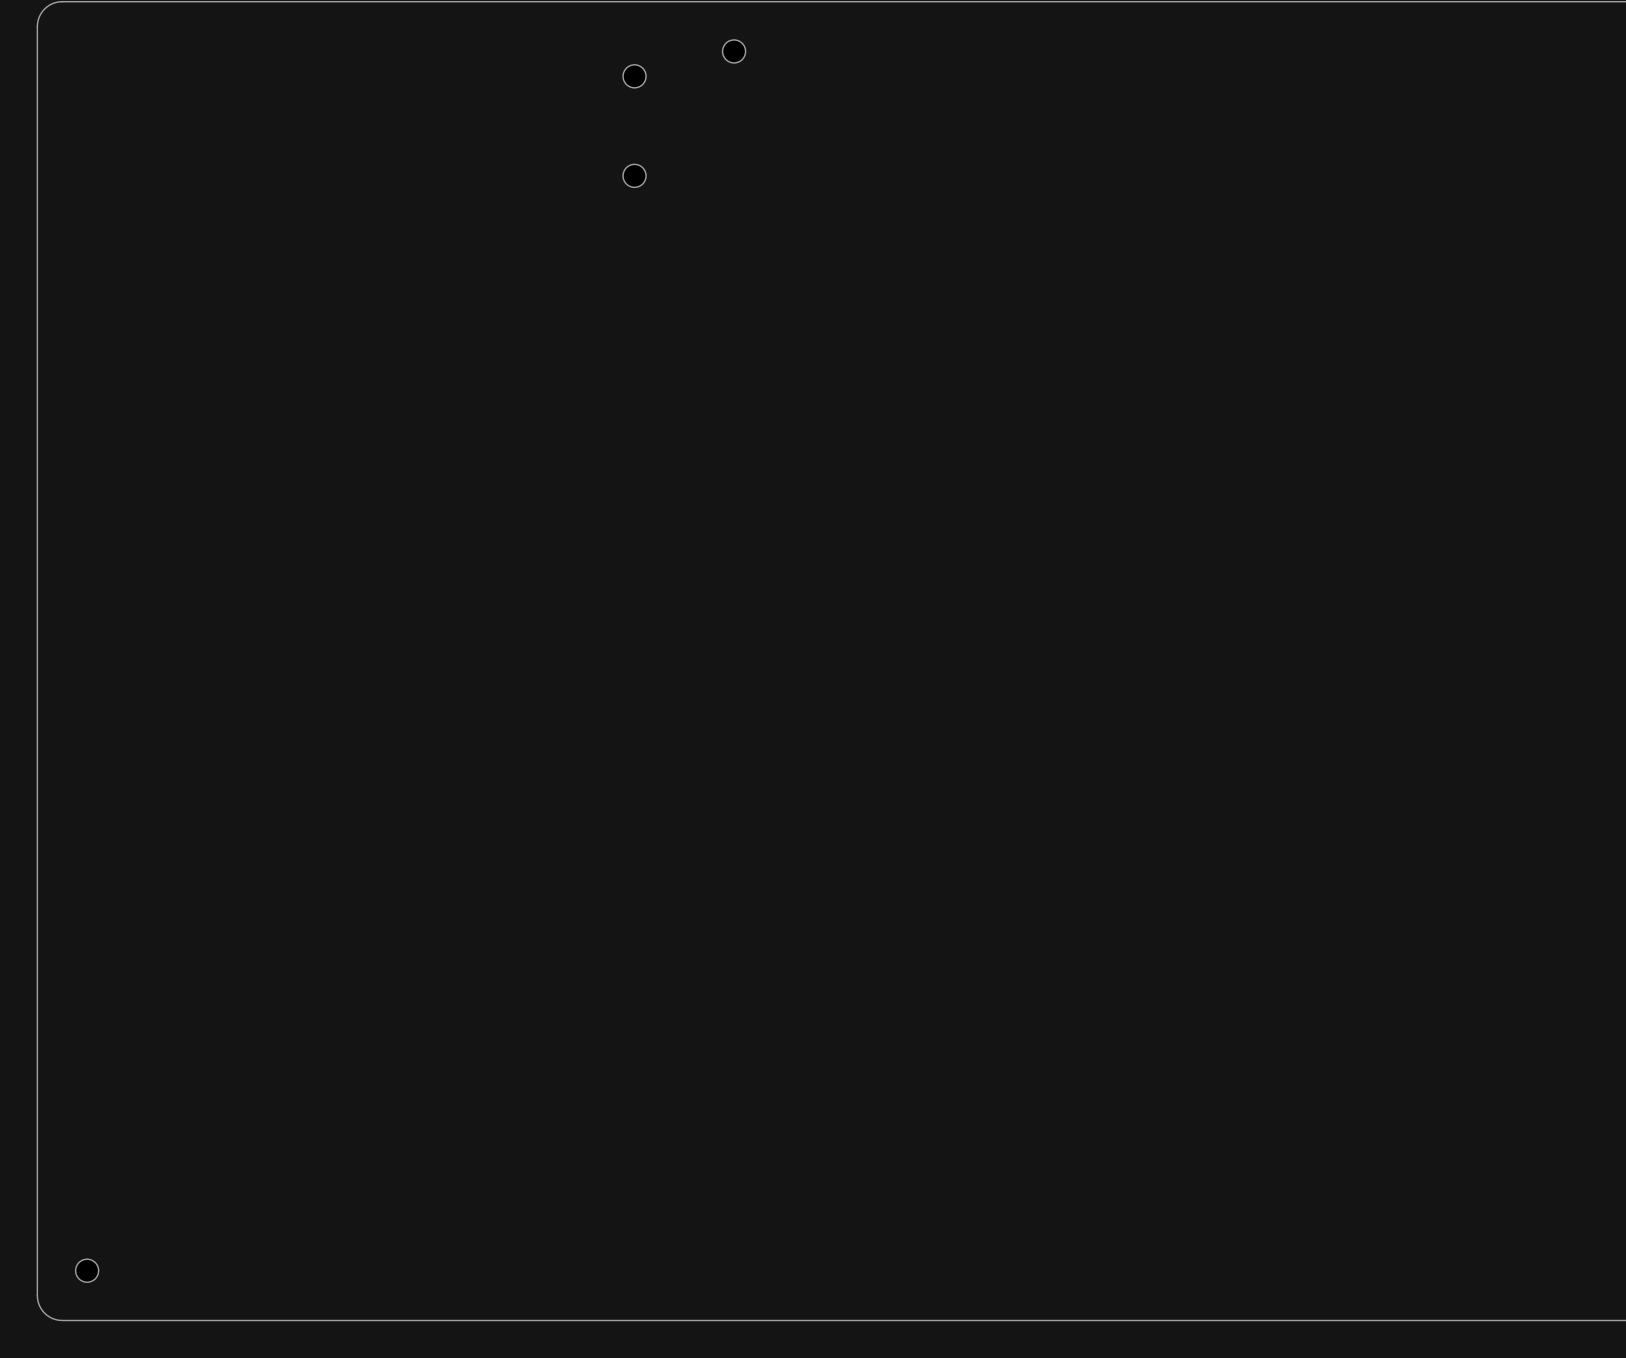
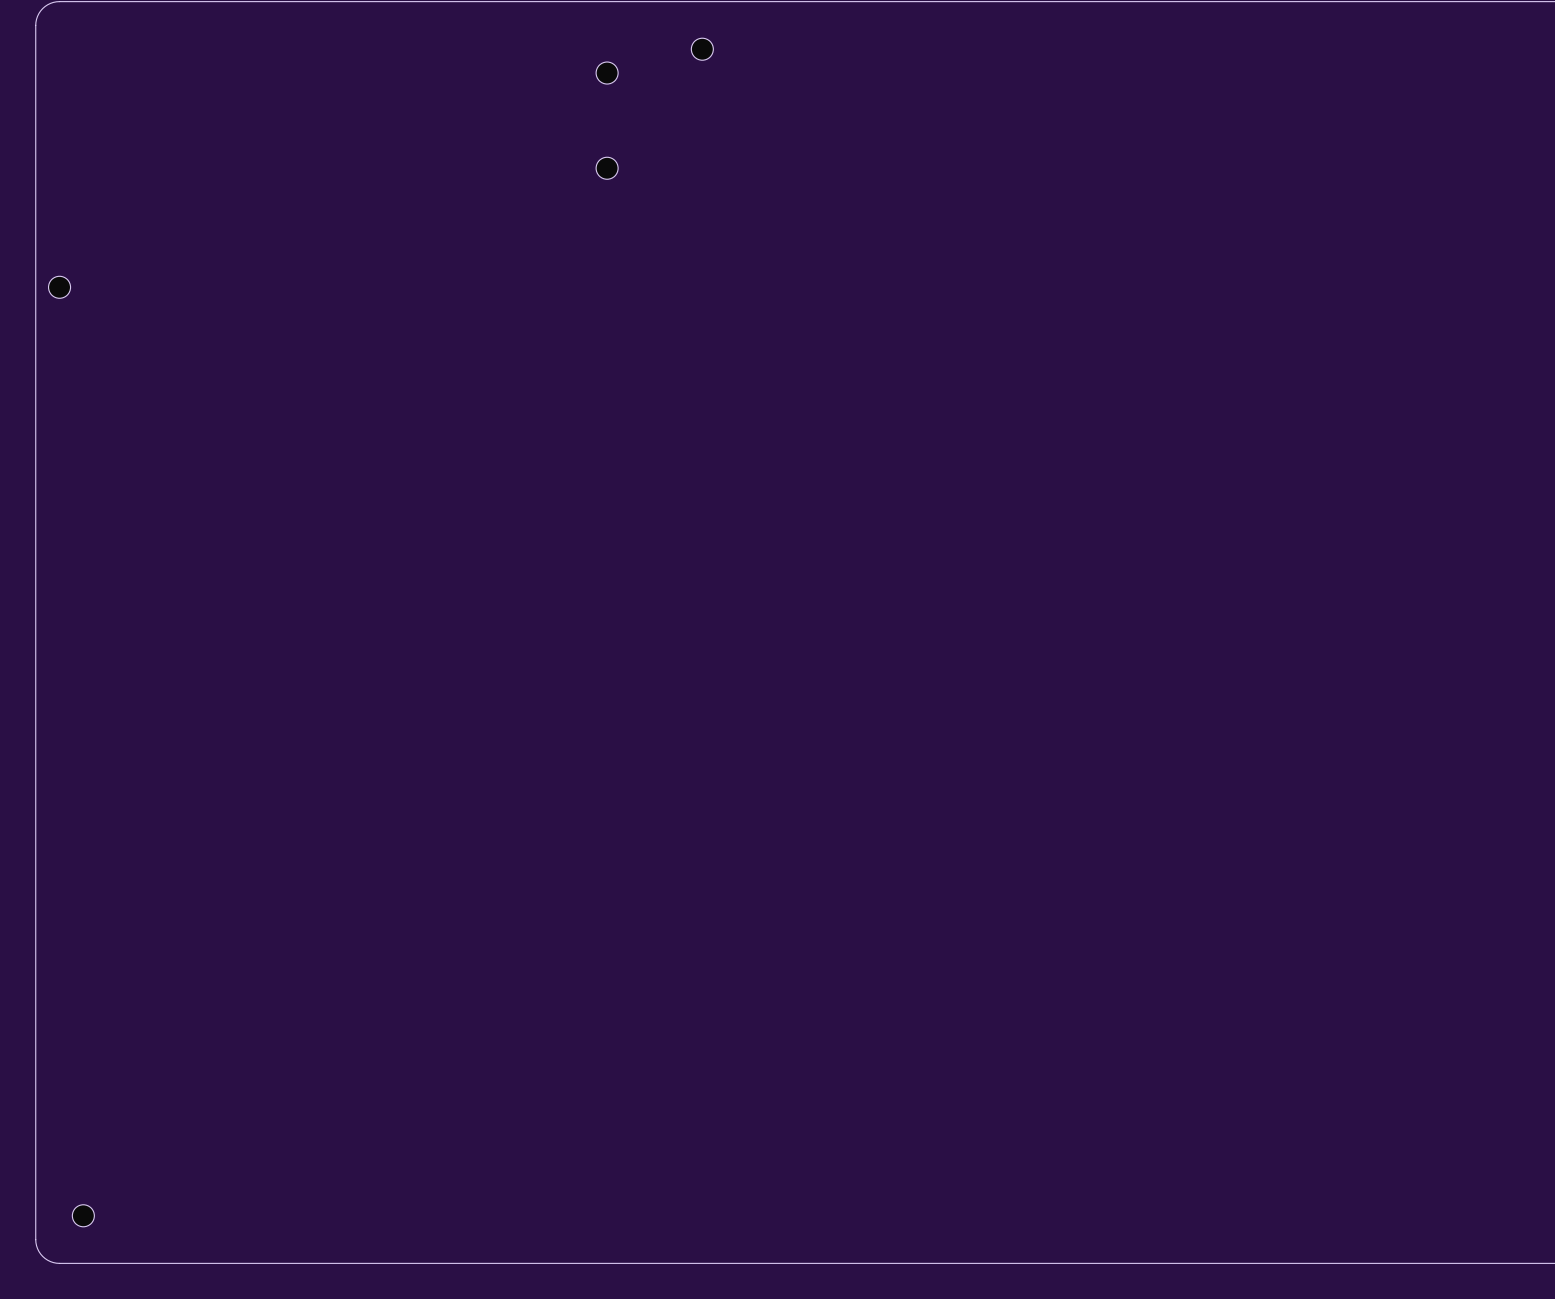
part: none -> (59, 287)

